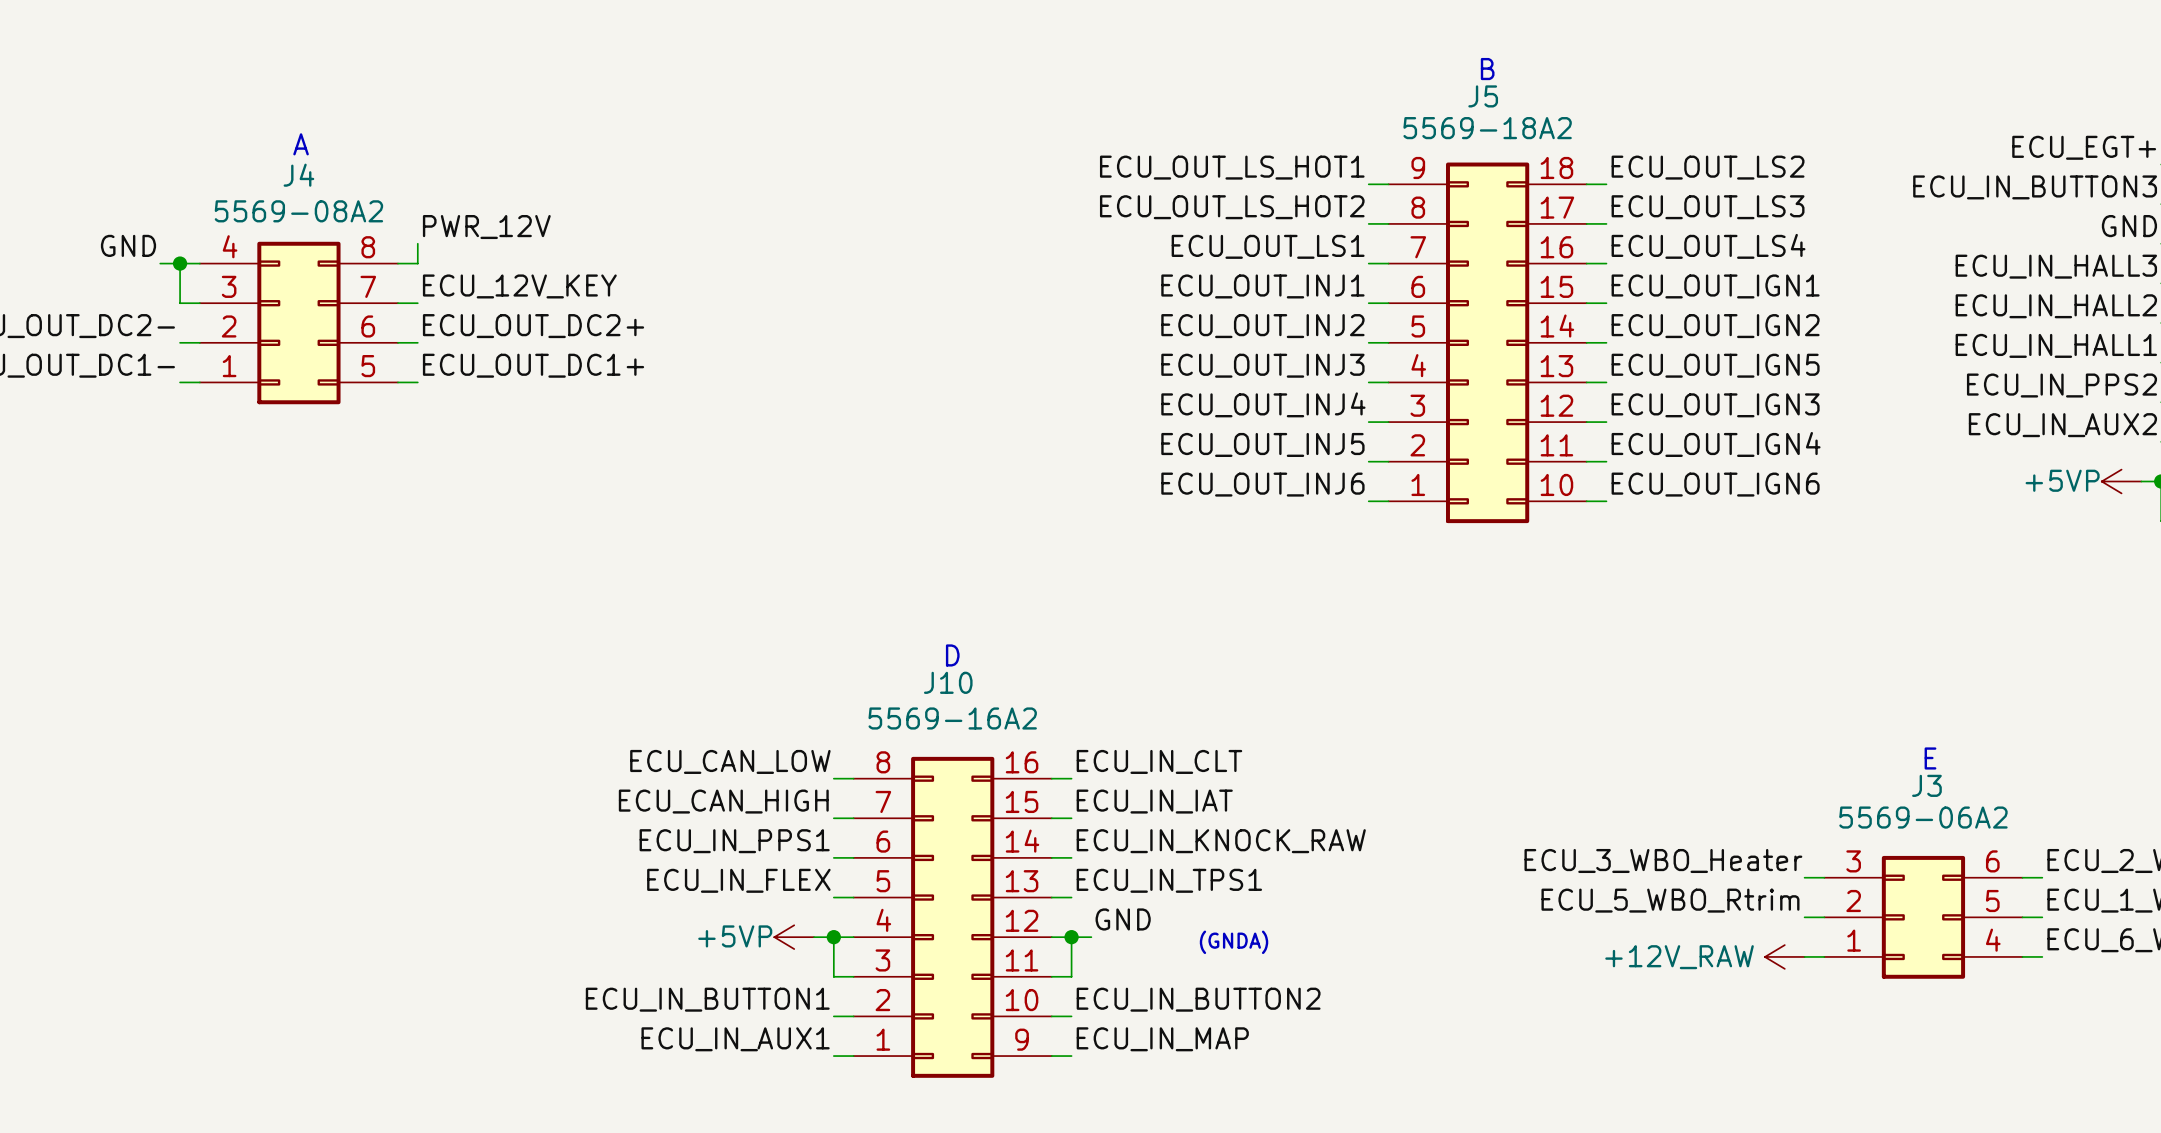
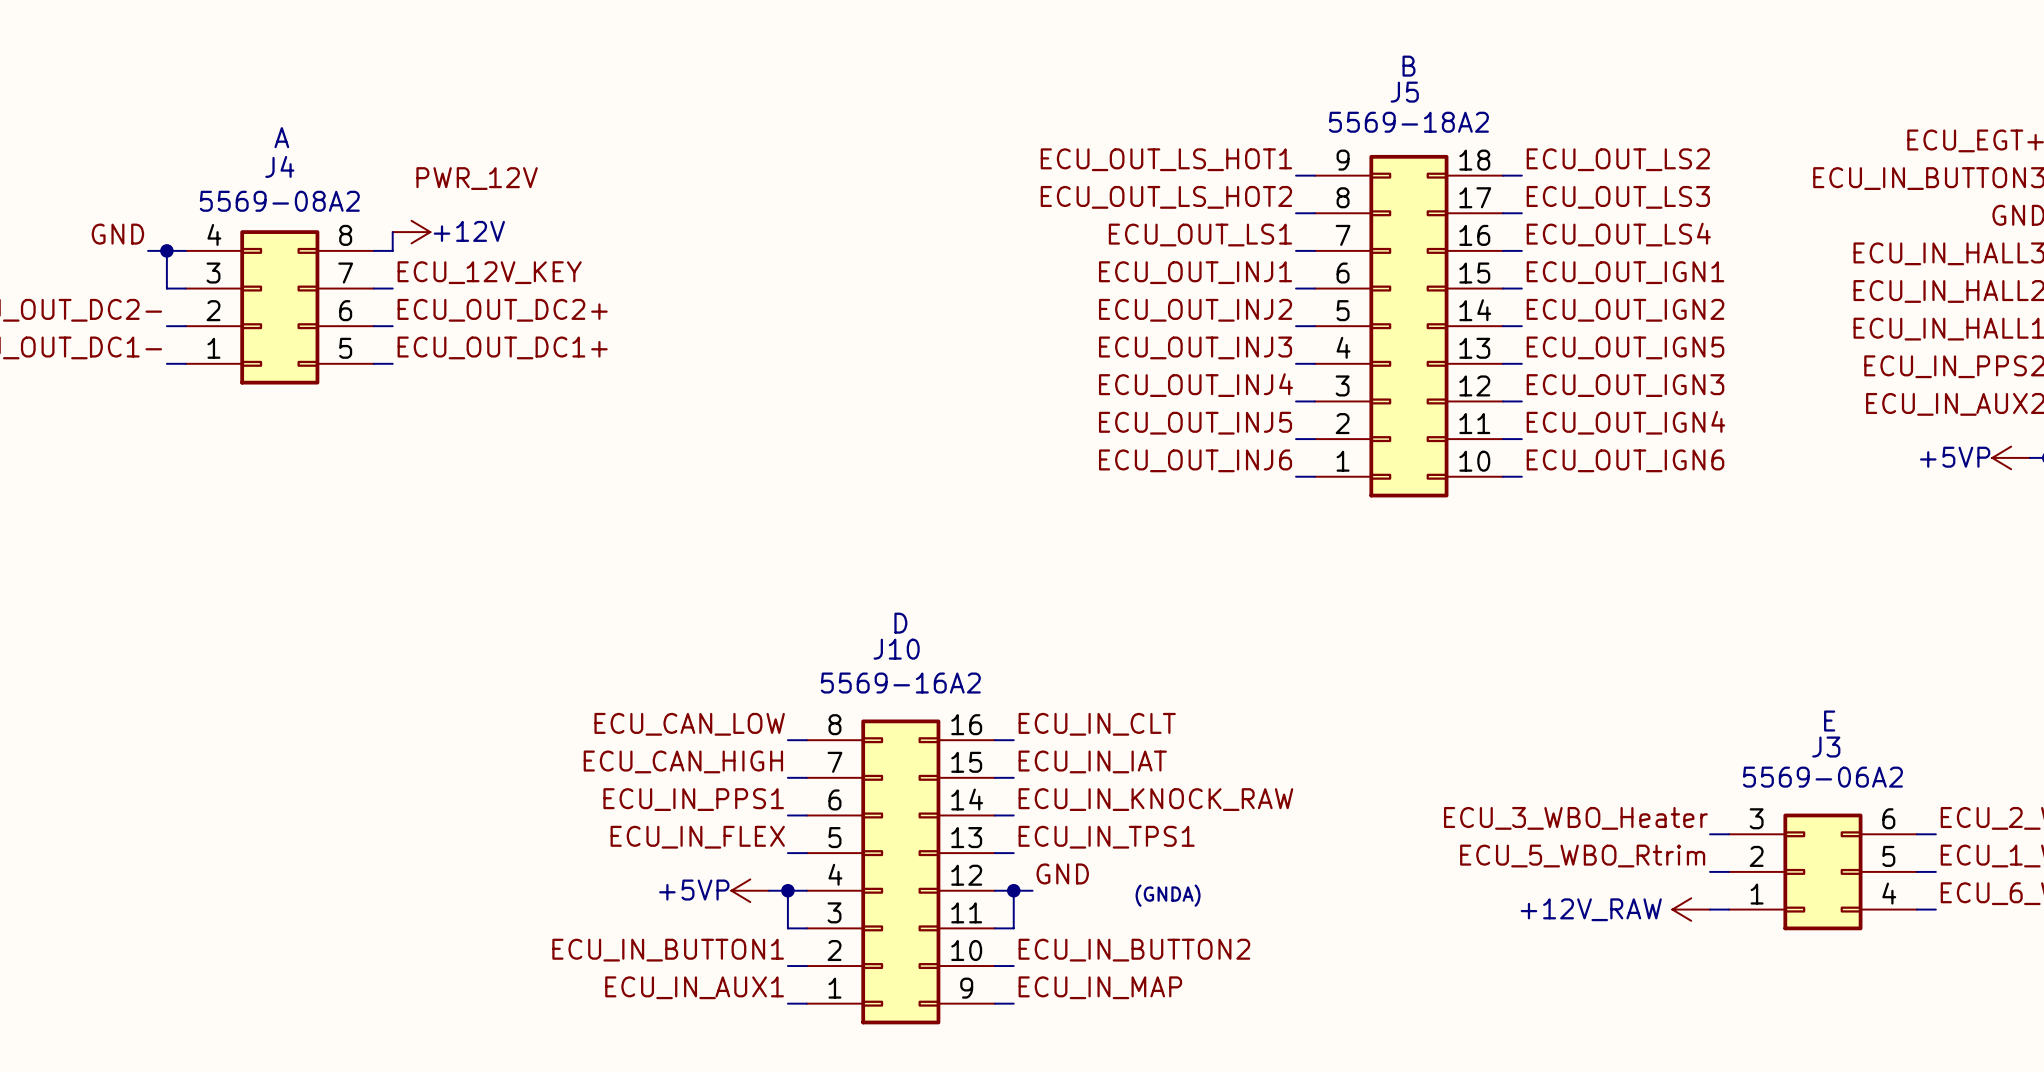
label position: PWR_12V (486, 227) -> PWR_12V (477, 178)
power symbol: none -> +12V (411, 232)

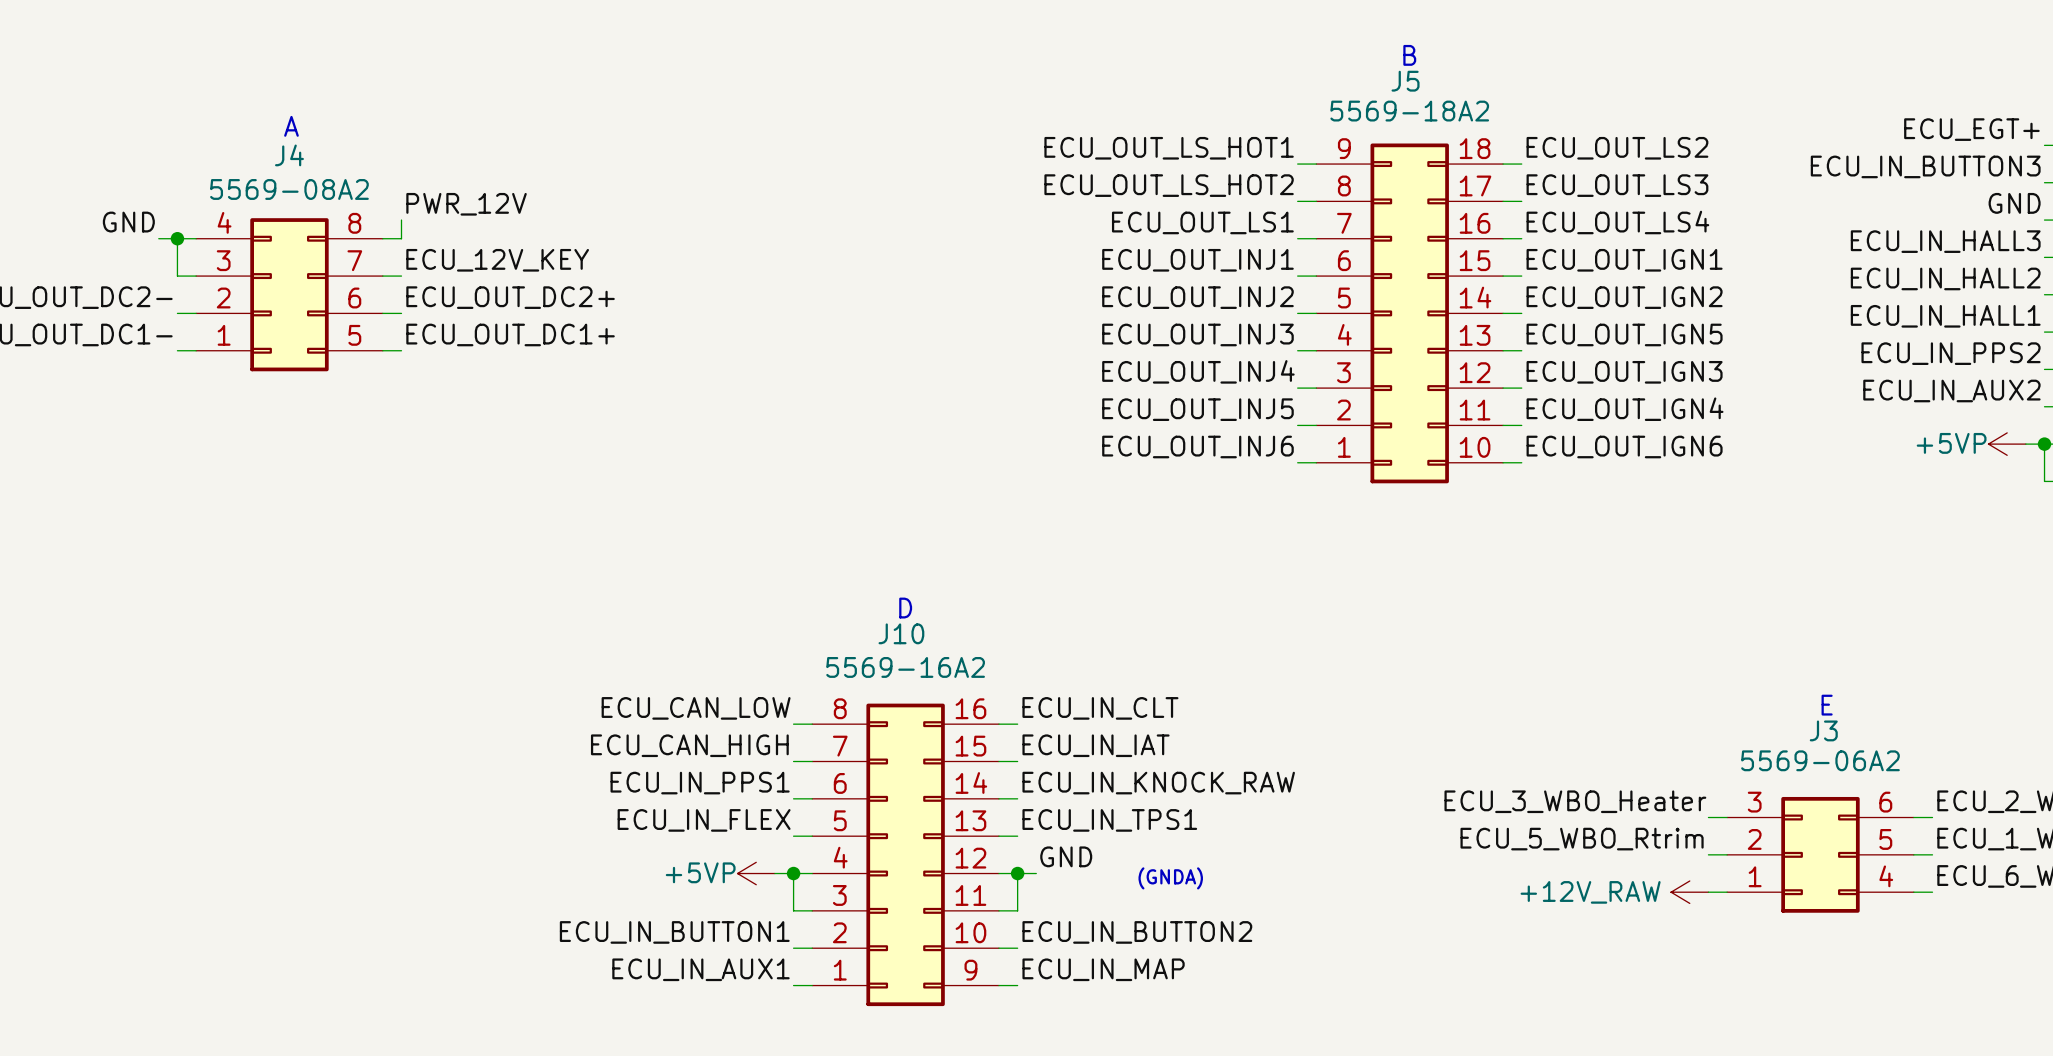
label position: PWR_12V (477, 178) -> PWR_12V (466, 204)
power symbol: +12V (411, 232) -> none

